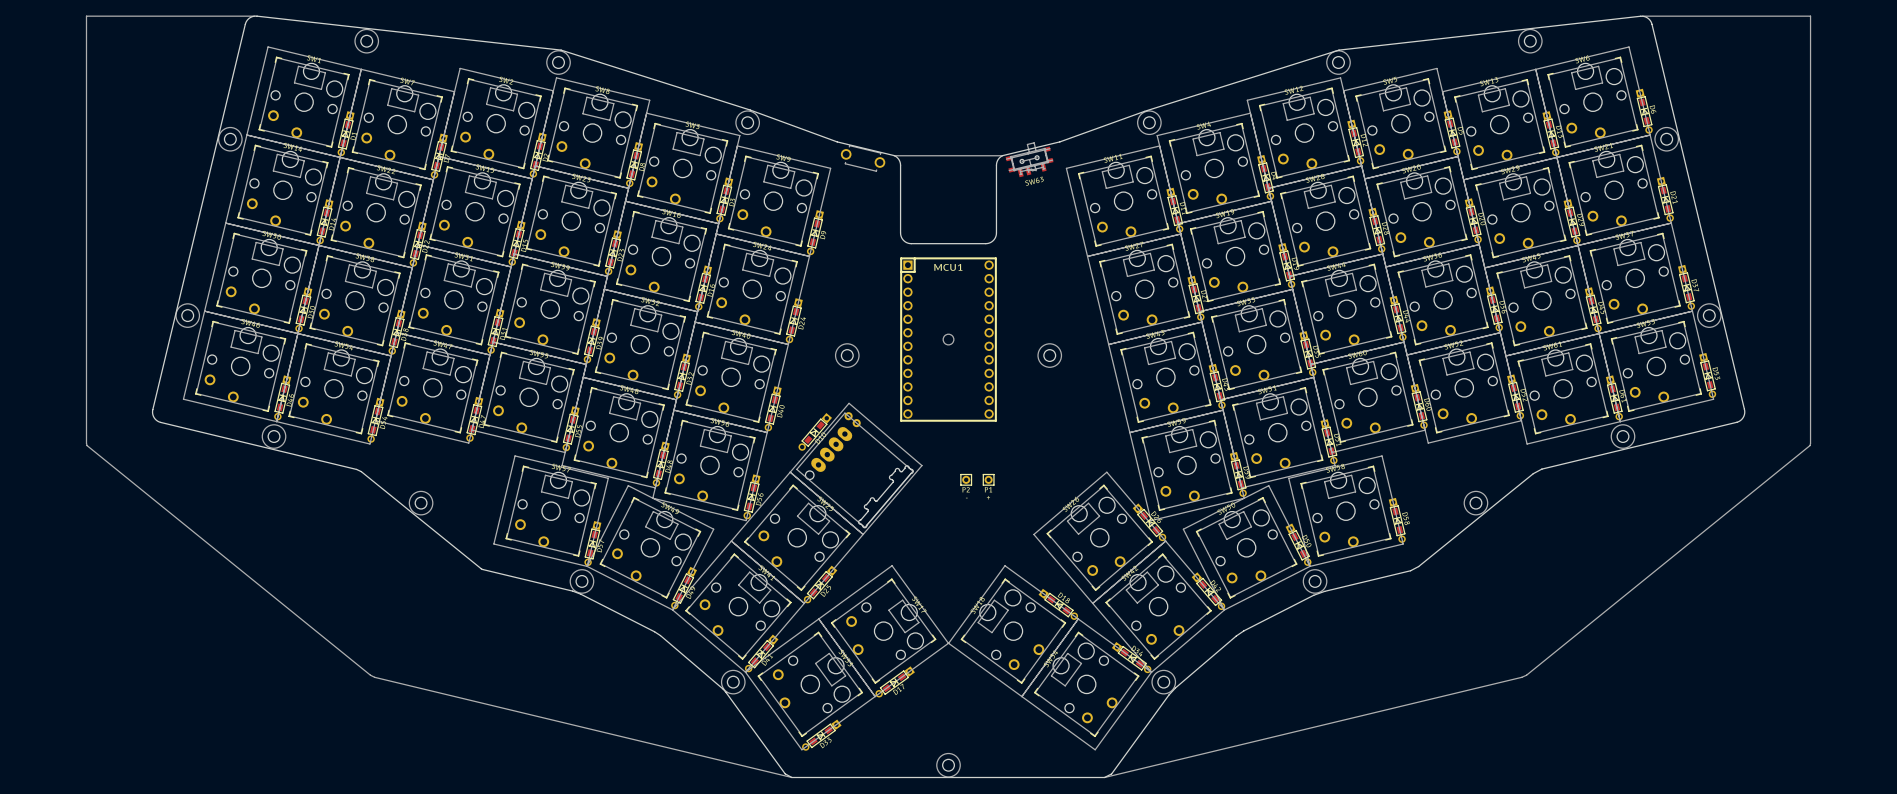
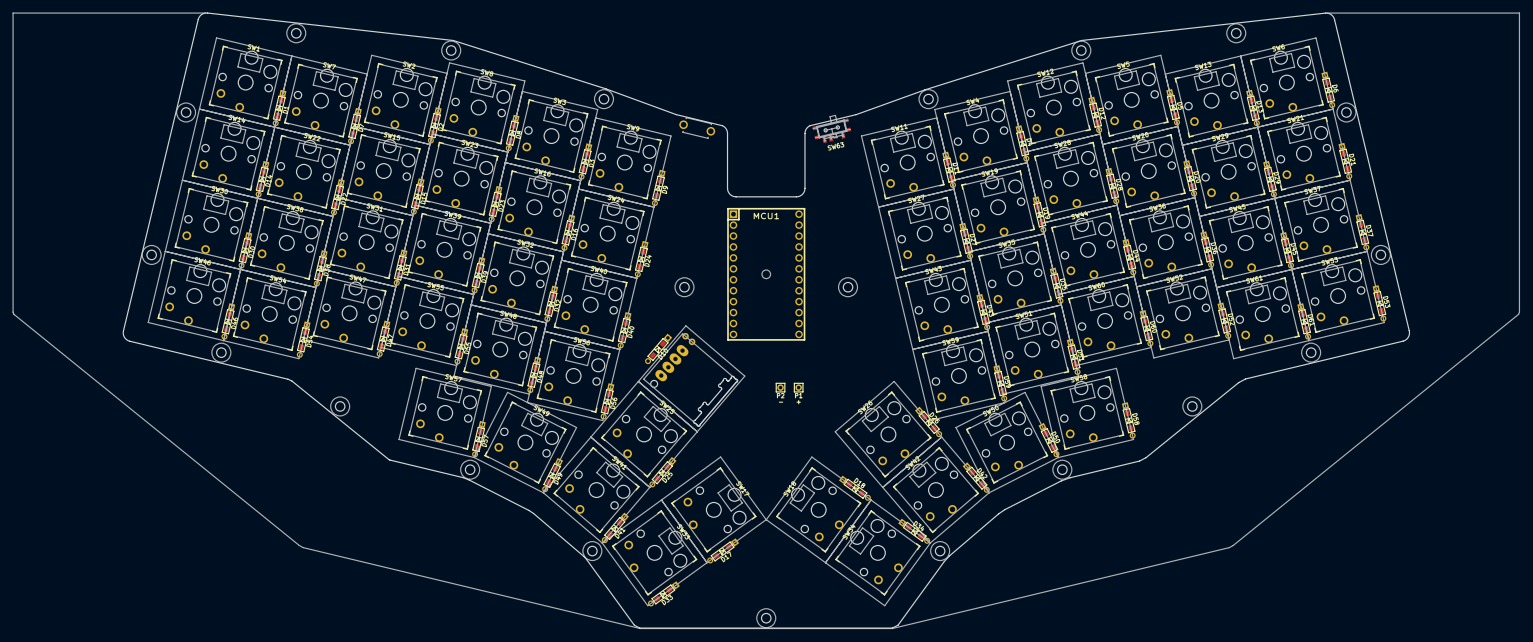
line: (86, 16) (87, 445) (374, 677) (791, 777) -> none
line: (1810, 16) (1810, 445) (1526, 675) (1104, 777) -> (1462, 13) (1519, 13) (1518, 314) (1229, 547) (892, 628) (640, 628) (299, 545) (13, 314) (13, 13) (69, 13)
line: (894, 155) (1002, 155) -> none

